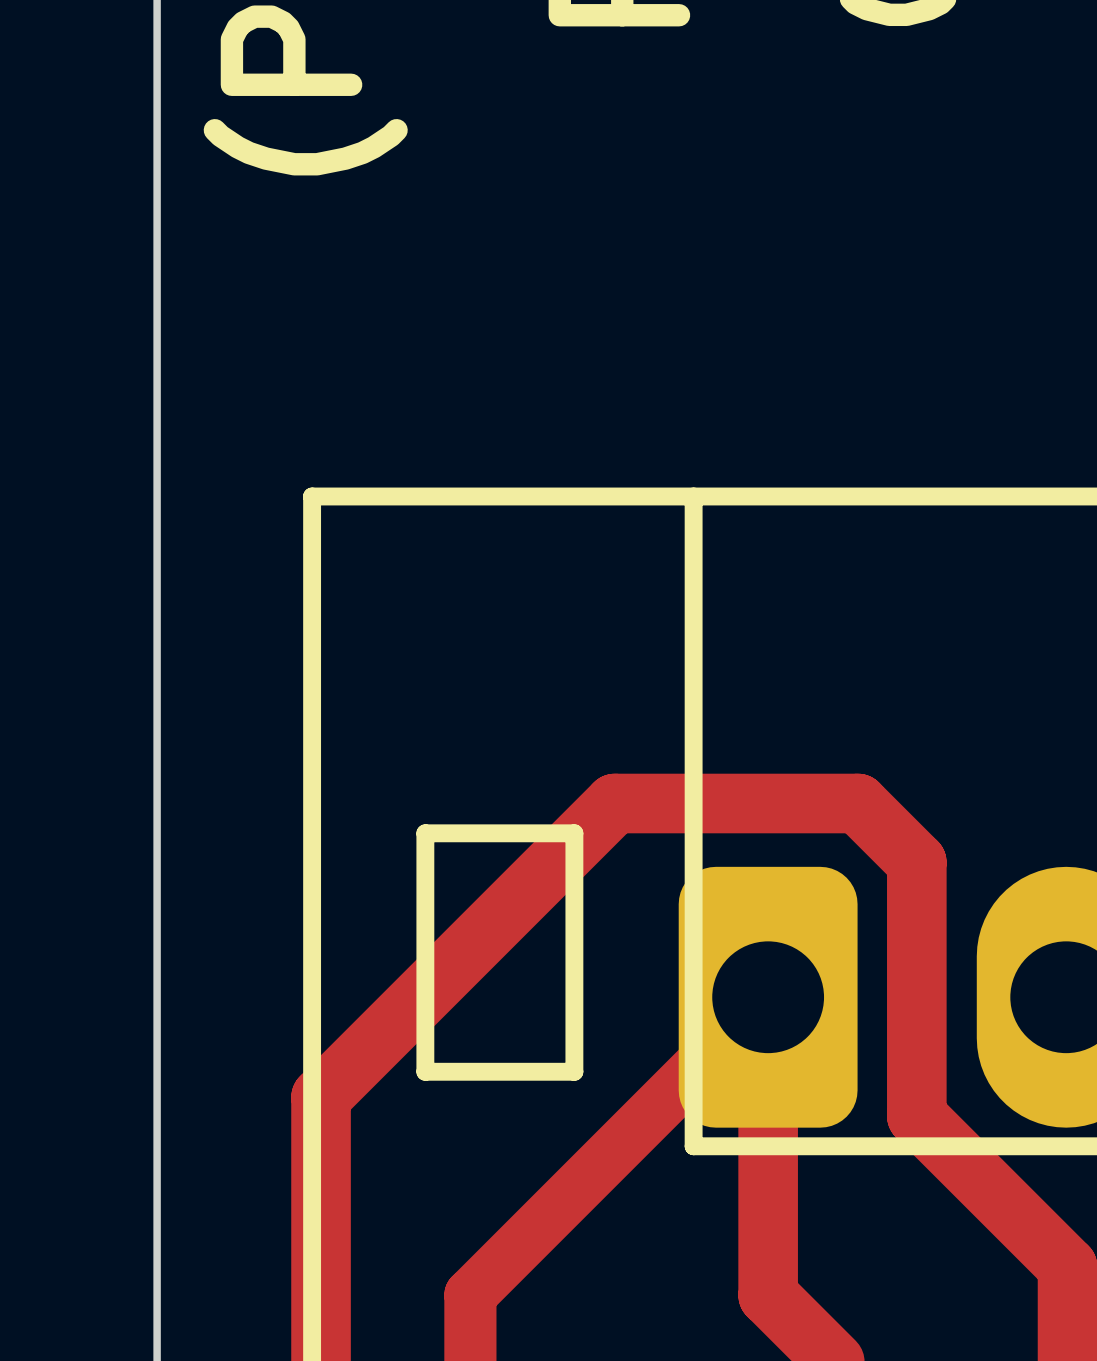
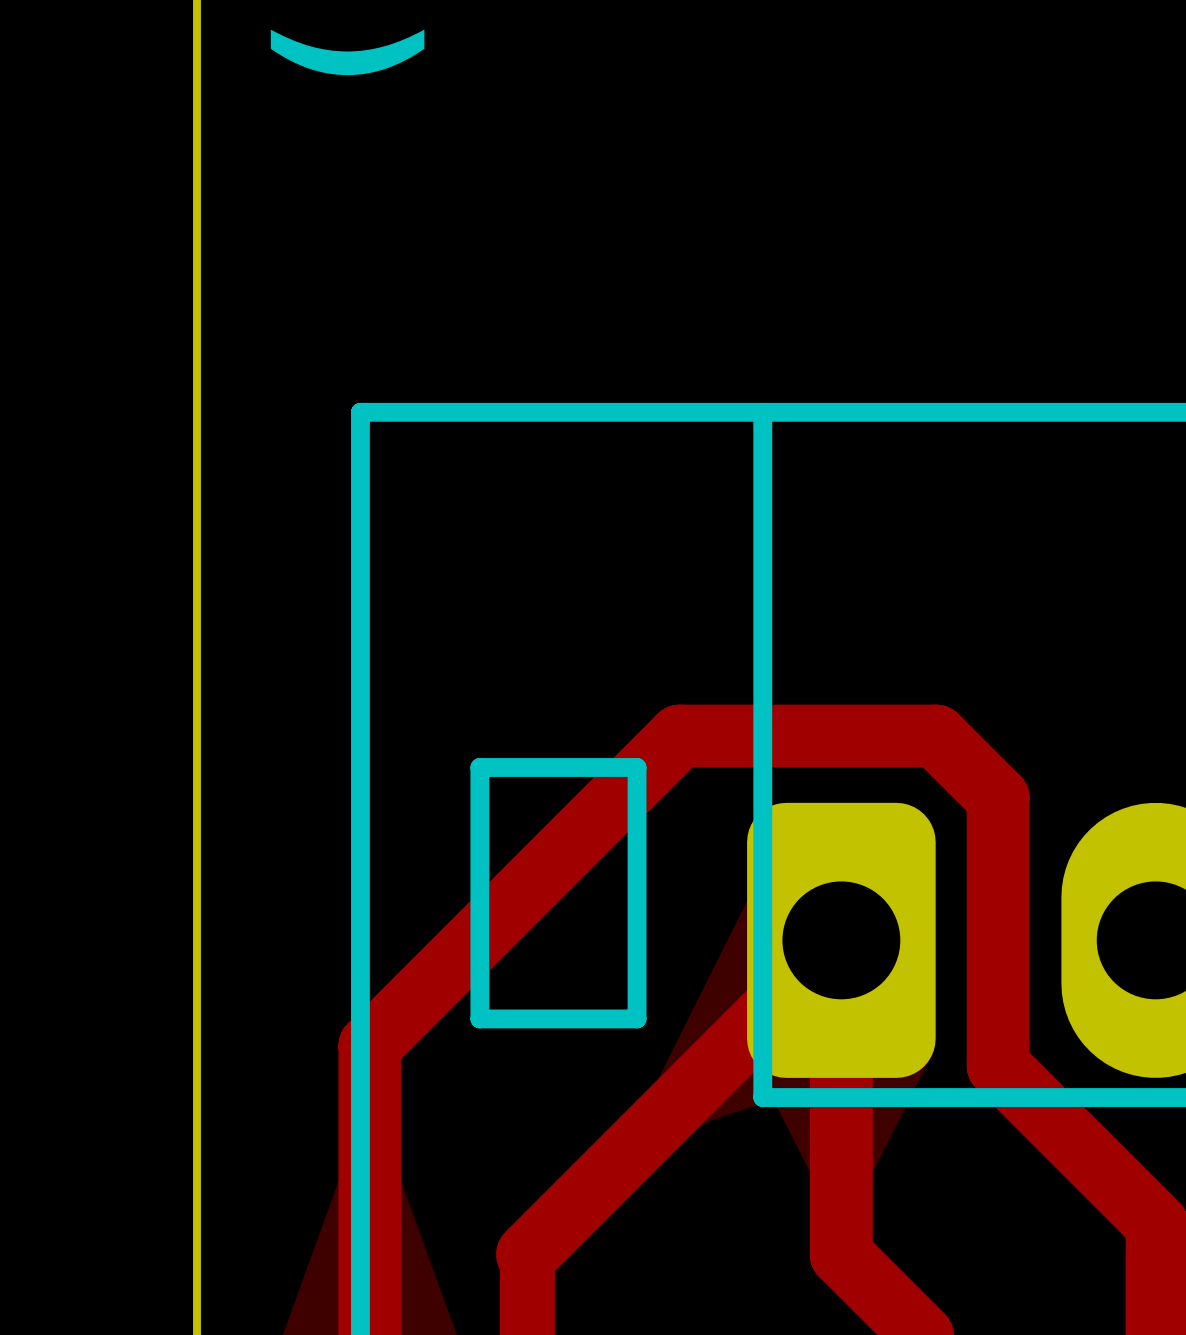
track width: thin (768, 997) (470, 1294) -> thick (841, 940) (527, 1254)

